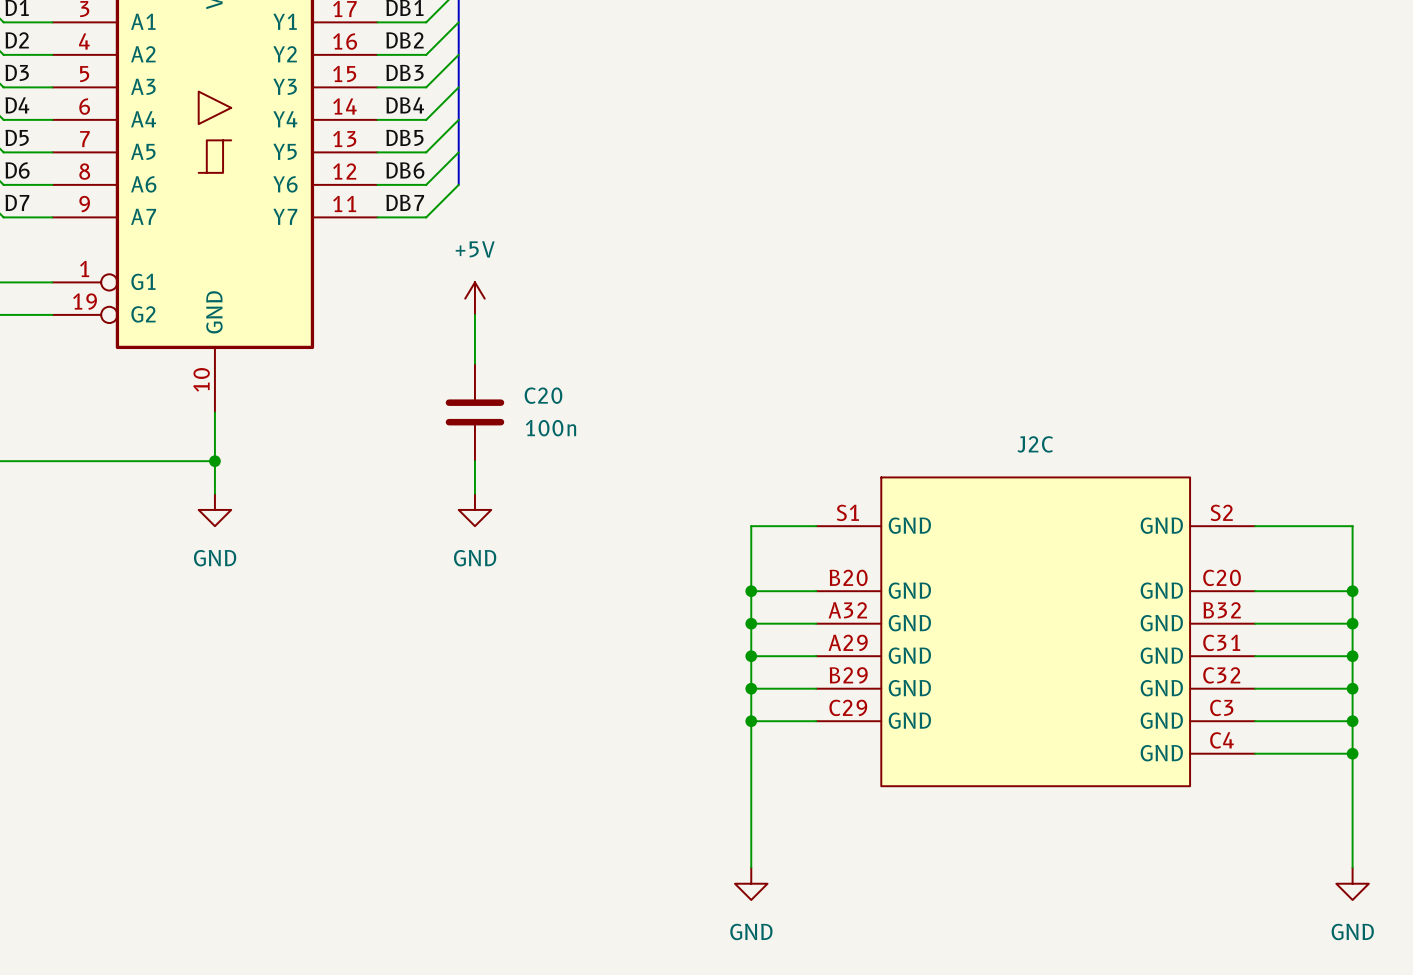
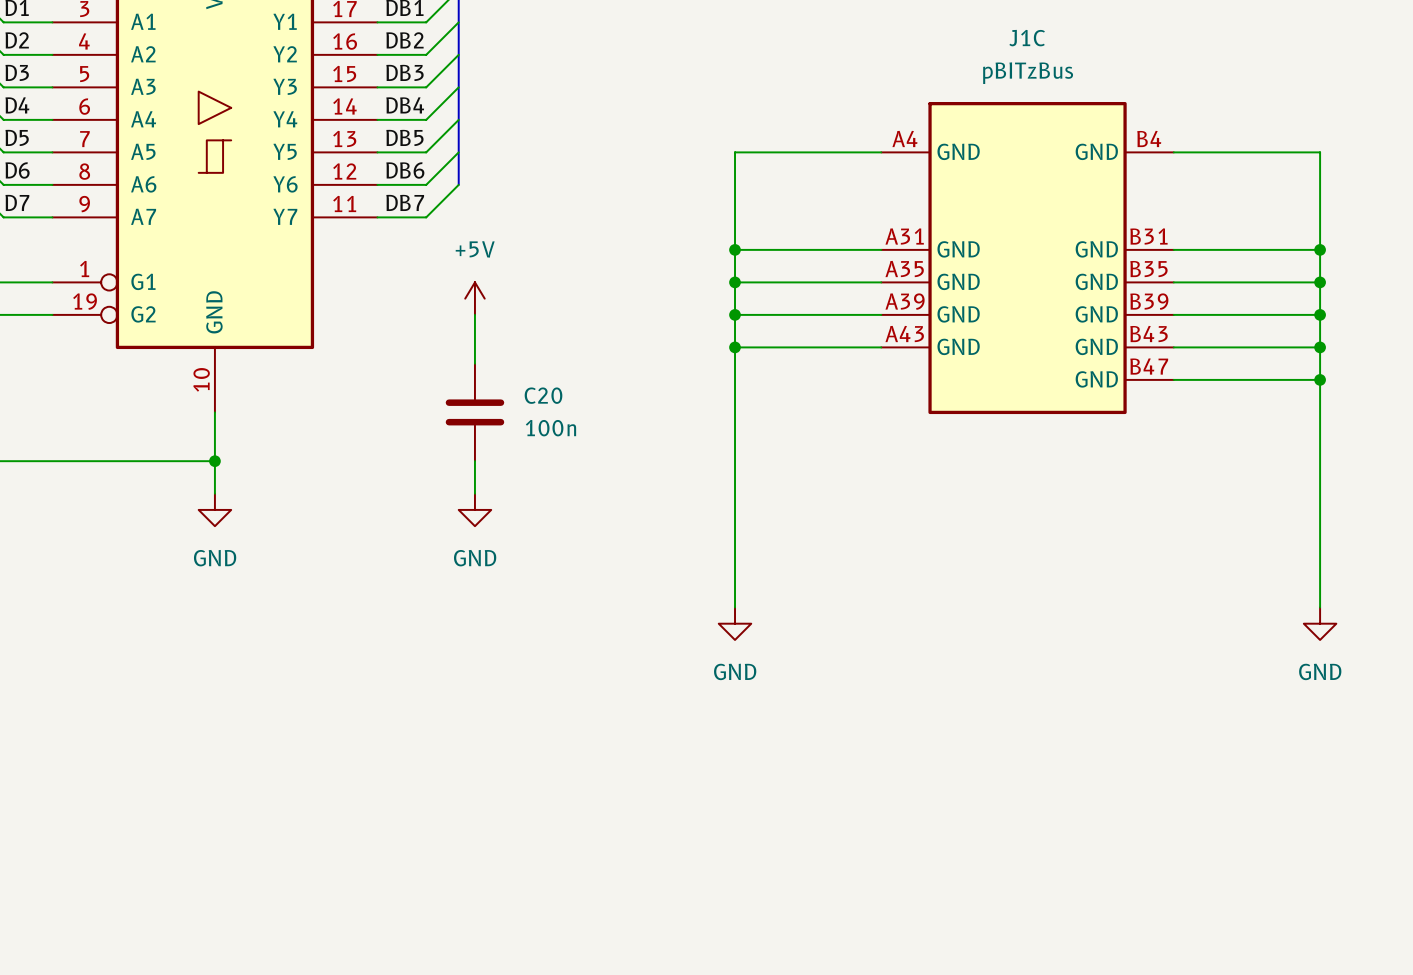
wire: none -> (881, 152) (735, 152) (735, 607)
wire: none -> (1173, 152) (1320, 152) (1320, 607)
wire: none -> (735, 249) (881, 249)
junction: none -> (735, 249)
wire: none -> (1173, 249) (1320, 249)
junction: none -> (1320, 249)
J1C: none -> pBITzBus (1027, 258)
wire: none -> (735, 282) (881, 282)
junction: none -> (735, 282)
wire: none -> (1173, 282) (1320, 282)
junction: none -> (1320, 282)
wire: none -> (735, 314) (881, 314)
junction: none -> (735, 314)
wire: none -> (1173, 314) (1320, 314)
junction: none -> (1320, 314)
wire: none -> (735, 347) (881, 347)
junction: none -> (735, 347)
wire: none -> (1173, 347) (1320, 347)
junction: none -> (1320, 347)
wire: none -> (1173, 379) (1320, 379)
junction: none -> (1320, 379)
wire: (816, 526) (751, 526) (751, 867) -> none
wire: (1255, 526) (1352, 526) (1352, 867) -> none
wire: (751, 591) (816, 591) -> none
junction: (751, 591) -> none
wire: (1255, 591) (1352, 591) -> none
junction: (1352, 591) -> none
wire: (751, 623) (816, 623) -> none
junction: (751, 623) -> none
wire: (1255, 623) (1352, 623) -> none
junction: (1352, 623) -> none
J2C: (1035, 631) -> none
wire: (751, 656) (816, 656) -> none
junction: (751, 656) -> none
wire: (1255, 656) (1352, 656) -> none
junction: (1352, 656) -> none
wire: (751, 688) (816, 688) -> none
junction: (751, 688) -> none
wire: (1255, 688) (1352, 688) -> none
junction: (1352, 688) -> none
wire: (751, 721) (816, 721) -> none
junction: (751, 721) -> none
wire: (1255, 721) (1352, 721) -> none
junction: (1352, 721) -> none
wire: (1255, 753) (1352, 753) -> none
junction: (1352, 753) -> none
power symbol position: GND (751, 883) -> GND (735, 623)
power symbol position: GND (1352, 883) -> GND (1320, 623)

